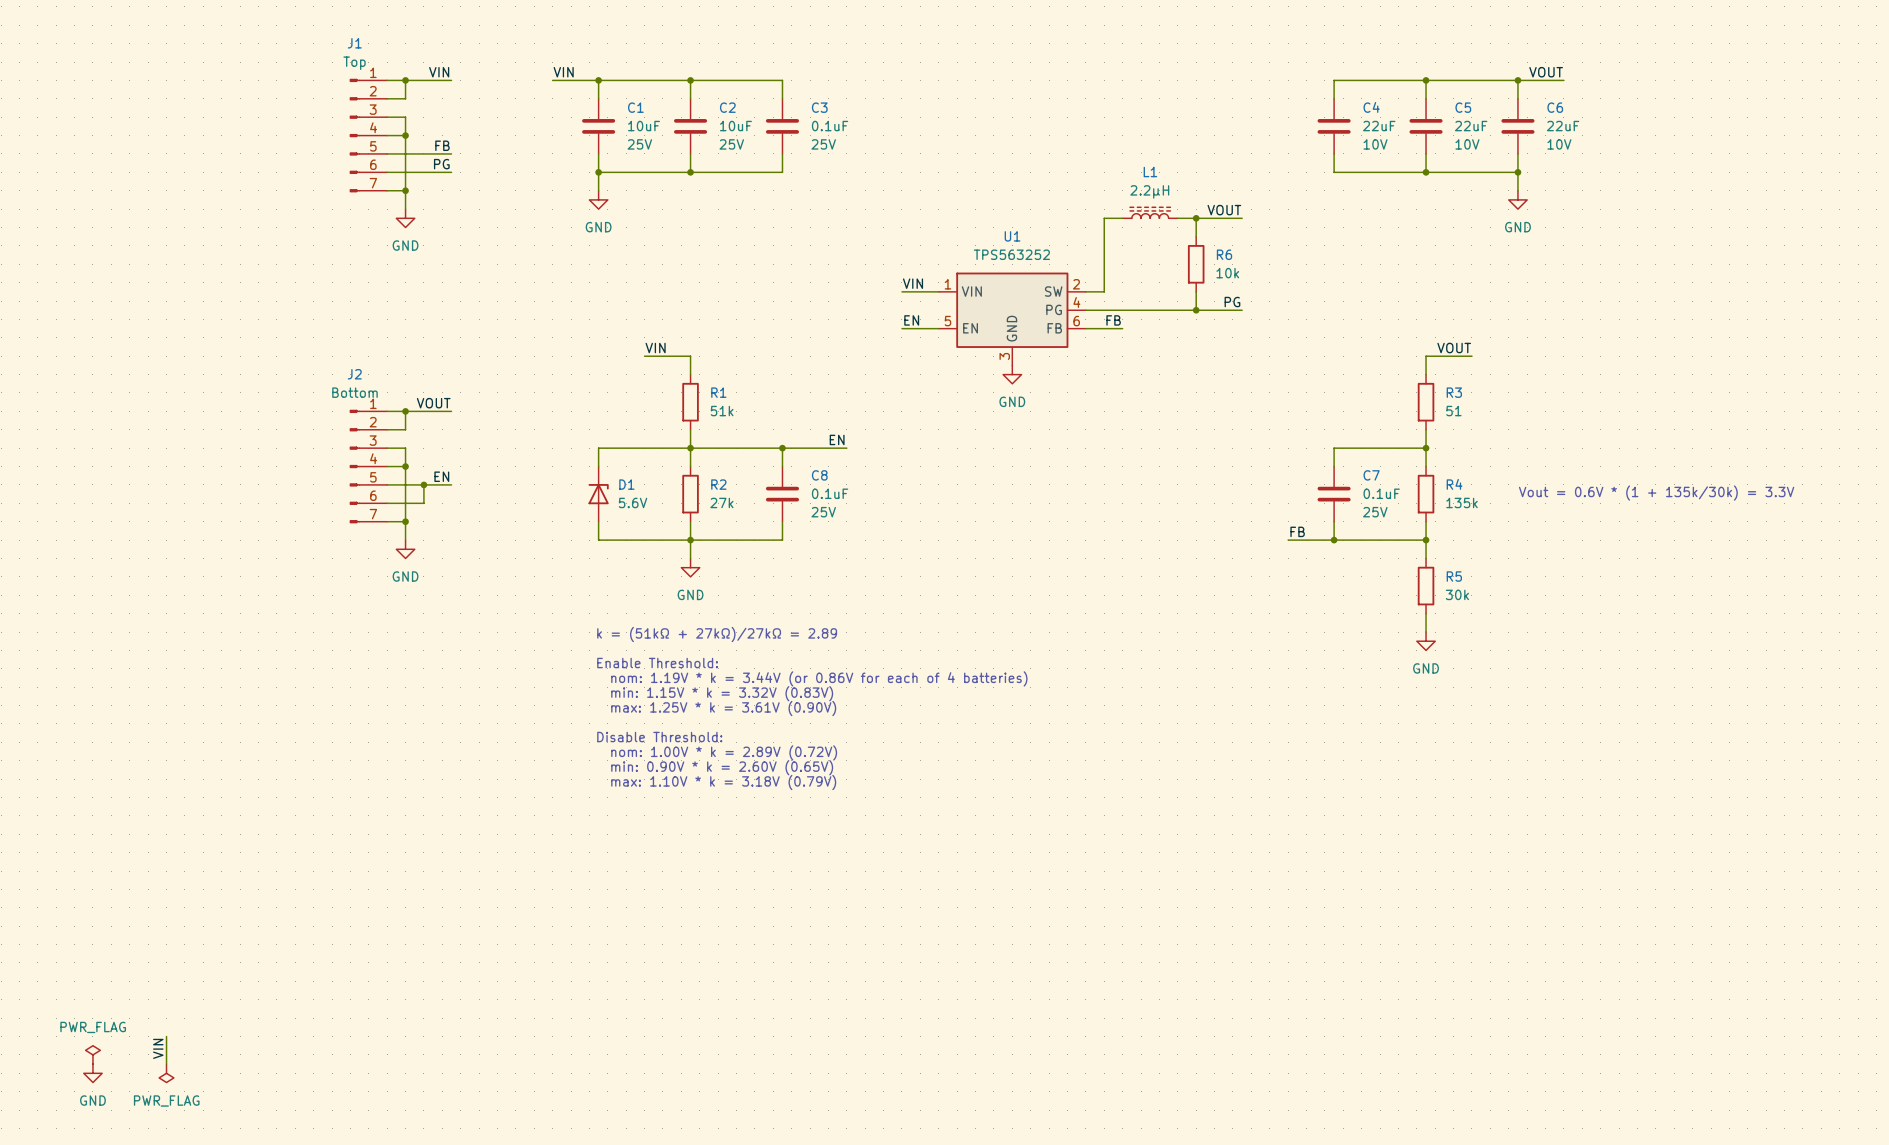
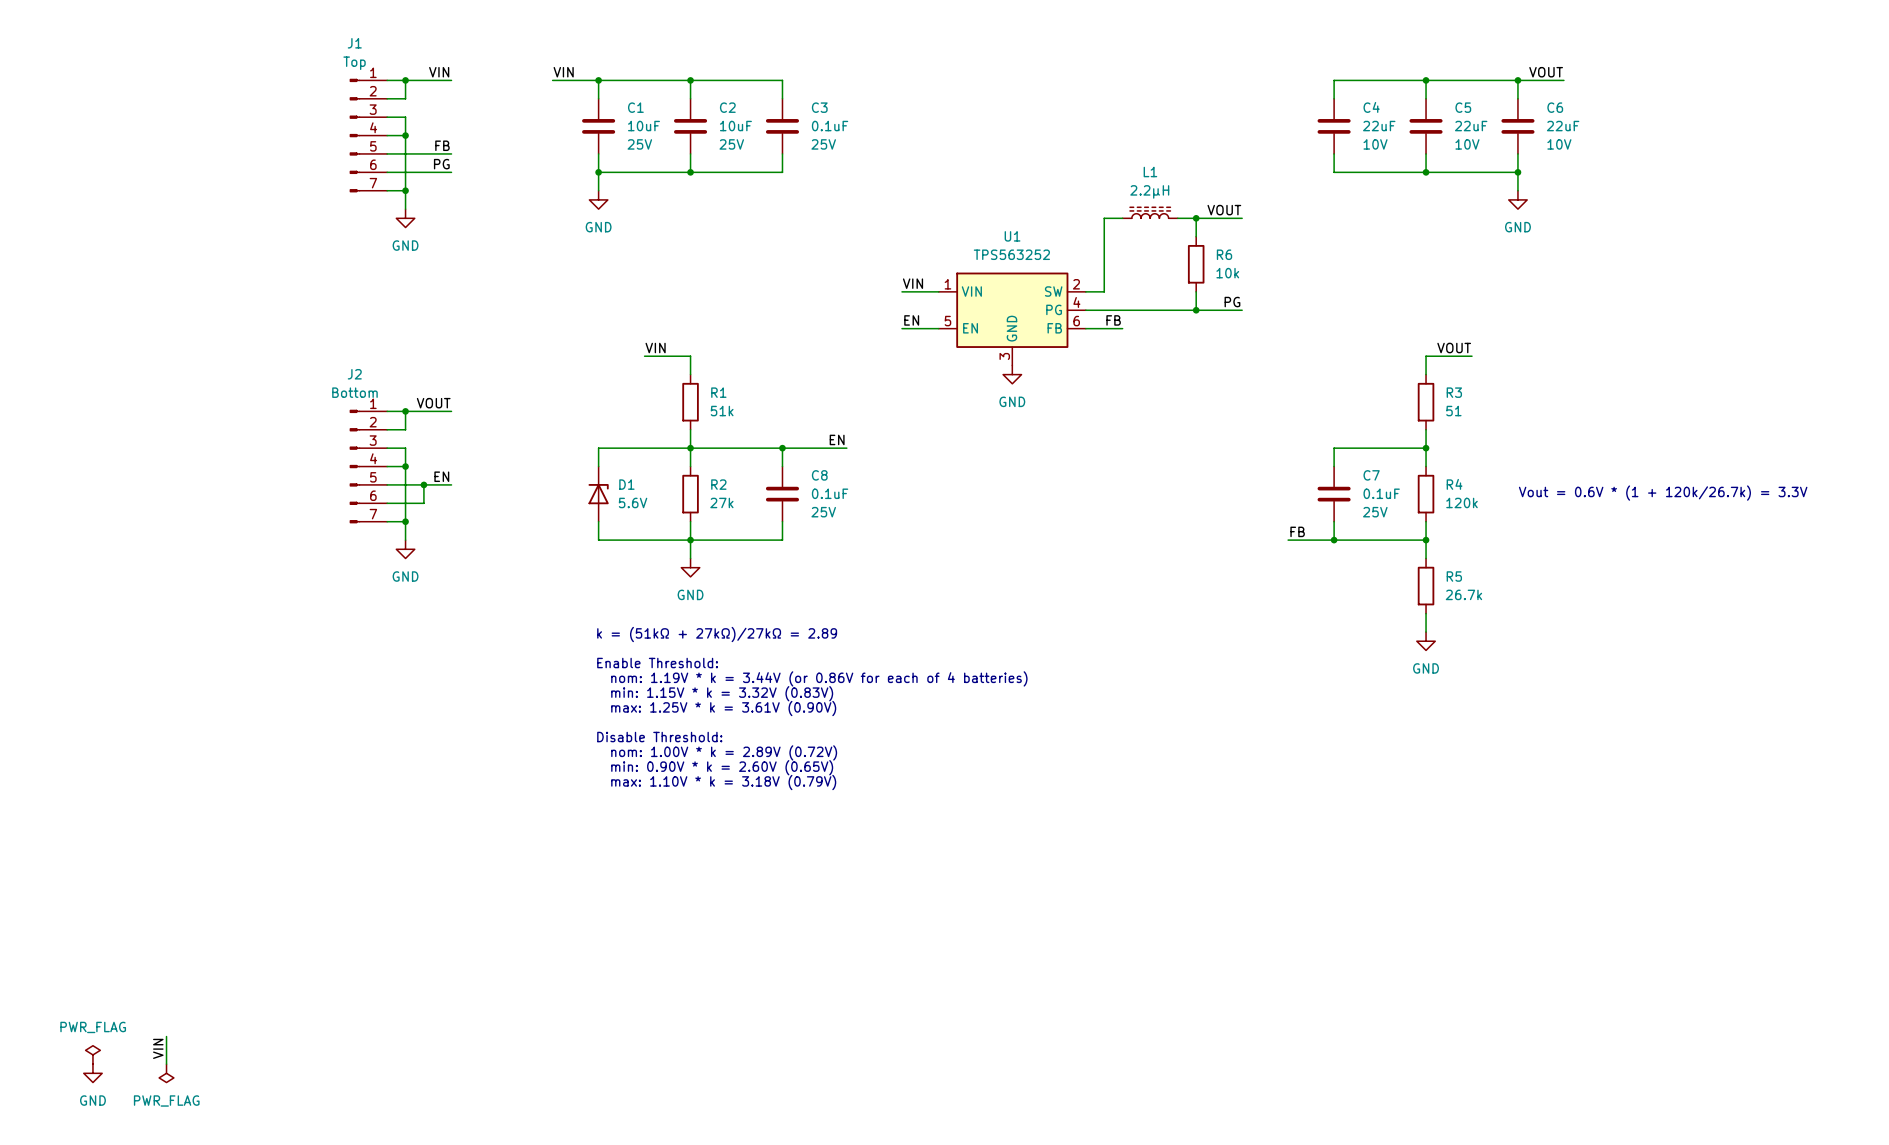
text: Vout = 0.6V * (1 + 135k/30k) = 3.3V (1656, 493) -> Vout = 0.6V * (1 + 120k/26.7k) = 3.3V (1663, 493)
R4 value: 135k (1461, 502) -> 120k (1461, 502)
R5 value: 30k (1457, 594) -> 26.7k (1463, 594)

